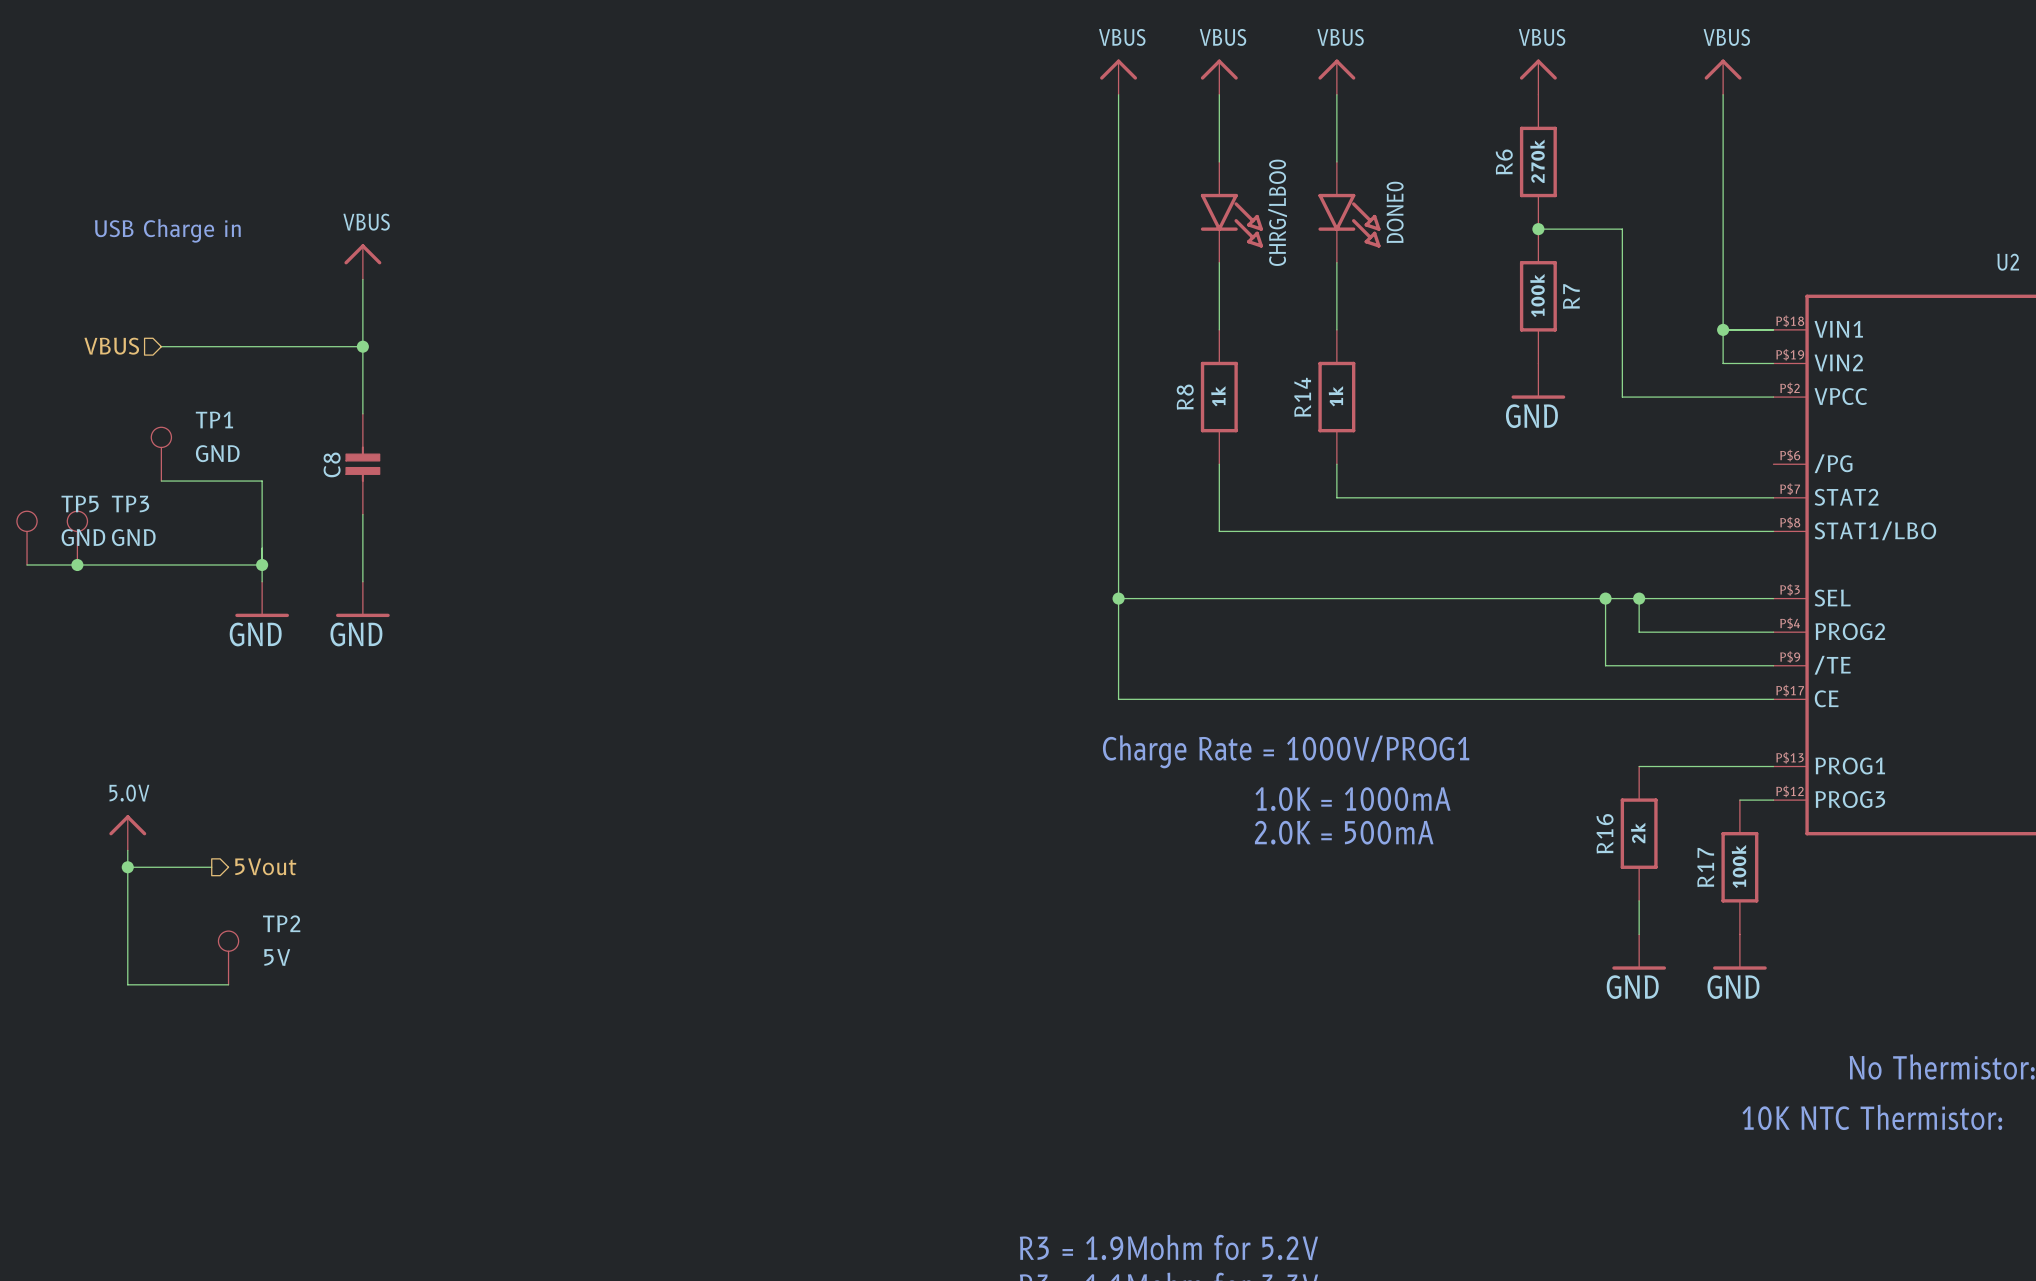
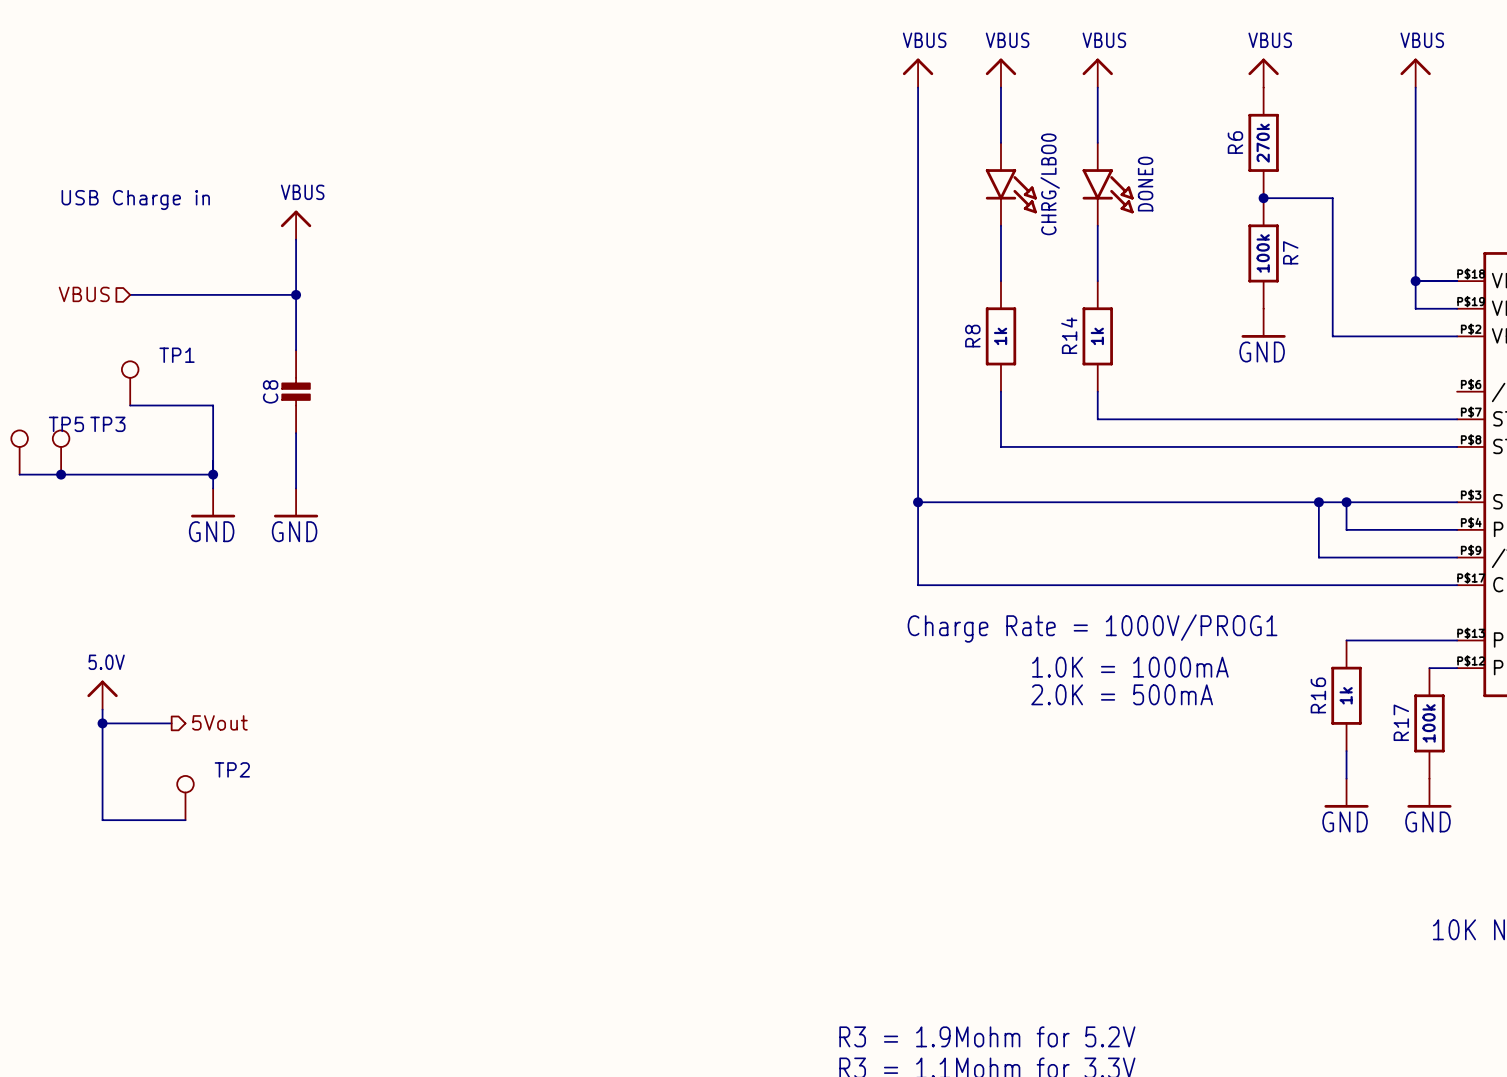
TP1 value: GND (217, 453) -> none
TP5 value: GND (83, 537) -> none
TP3 value: GND (133, 537) -> none
R16 value: 2k (1638, 833) -> 1k (1346, 695)
TP2 value: 5V (277, 957) -> none

